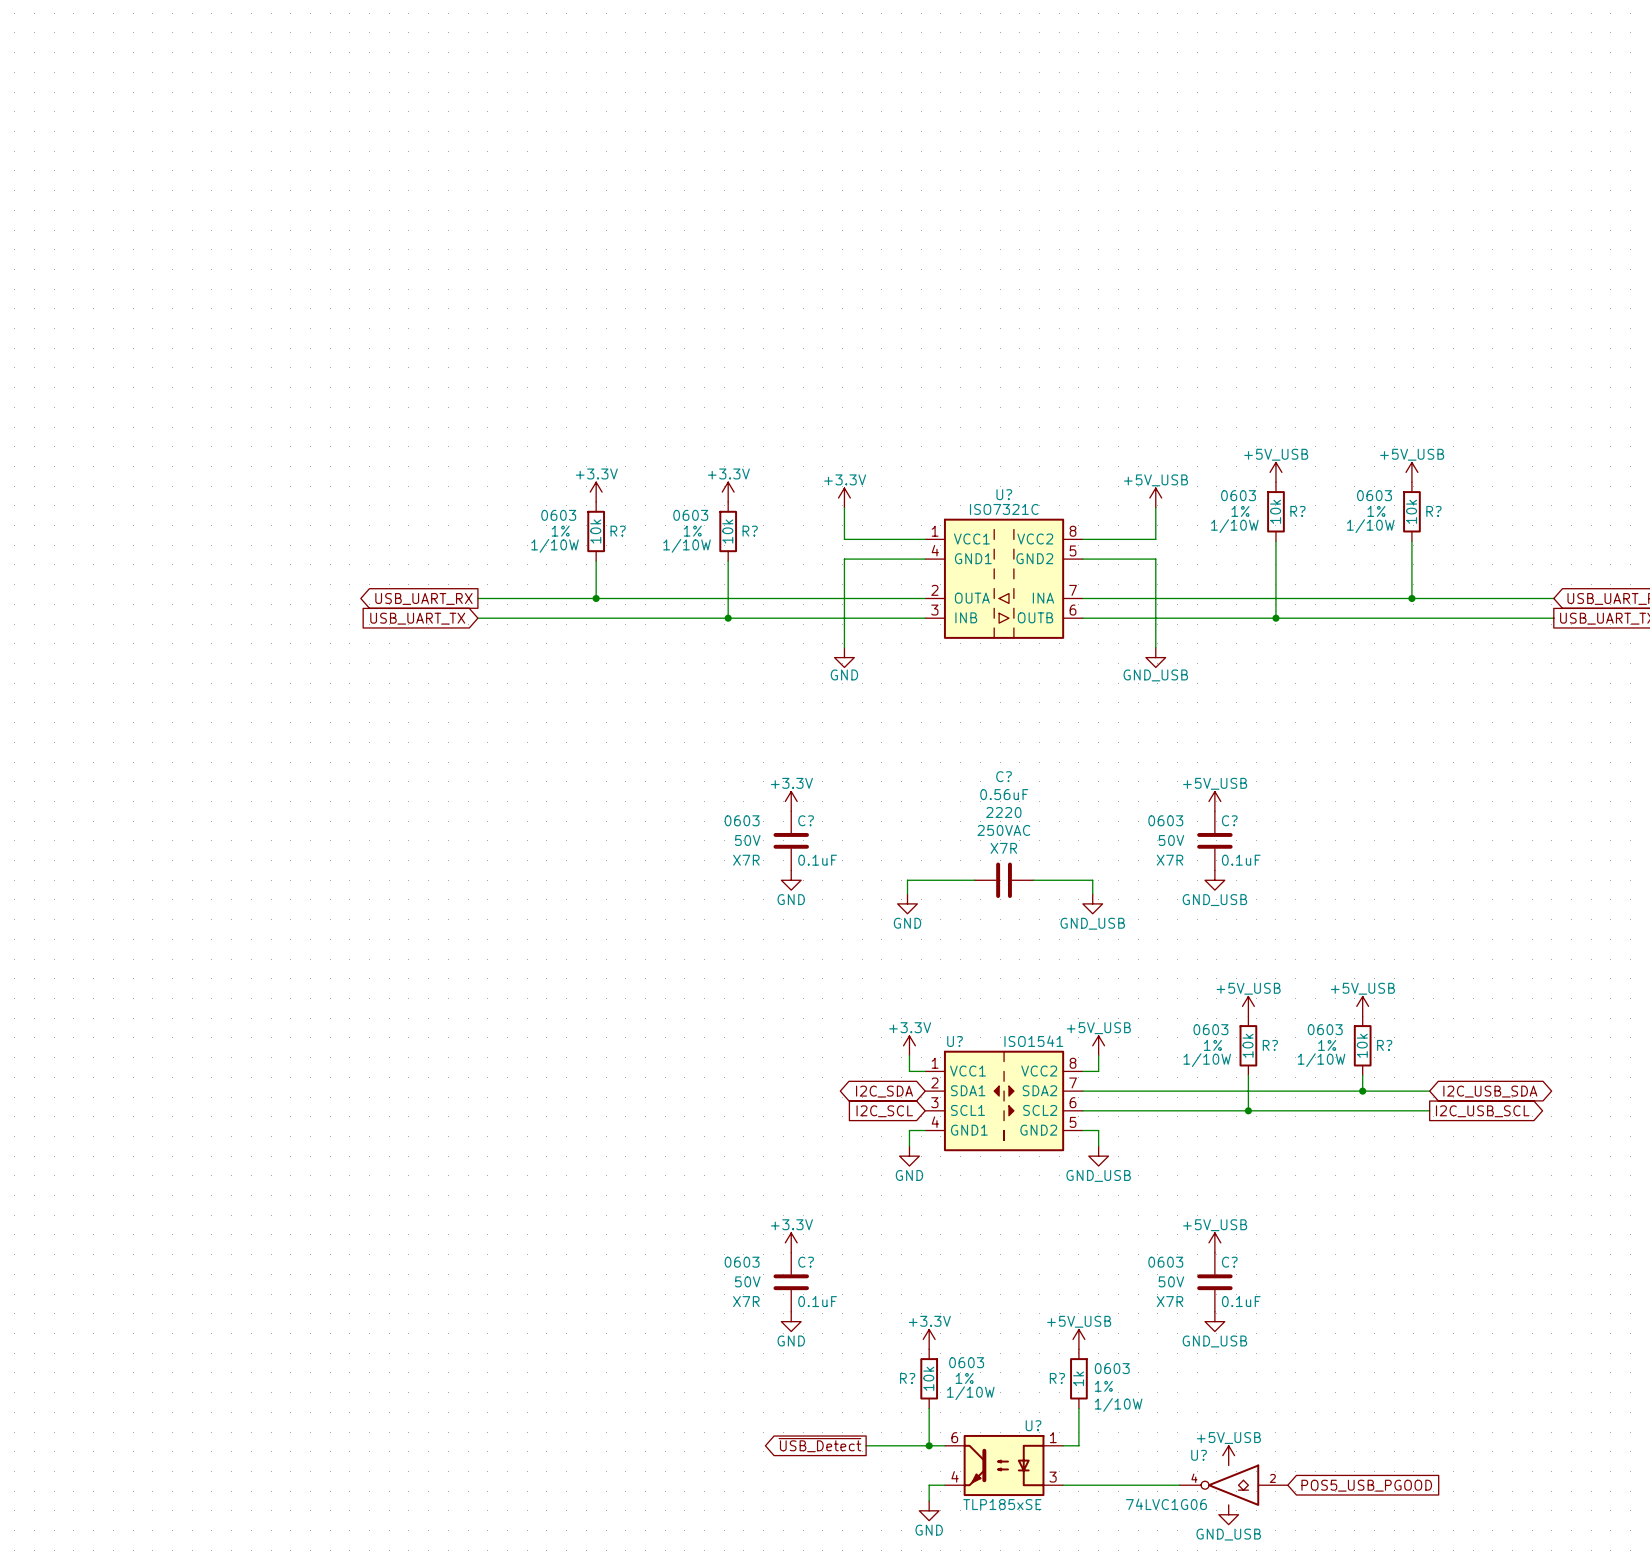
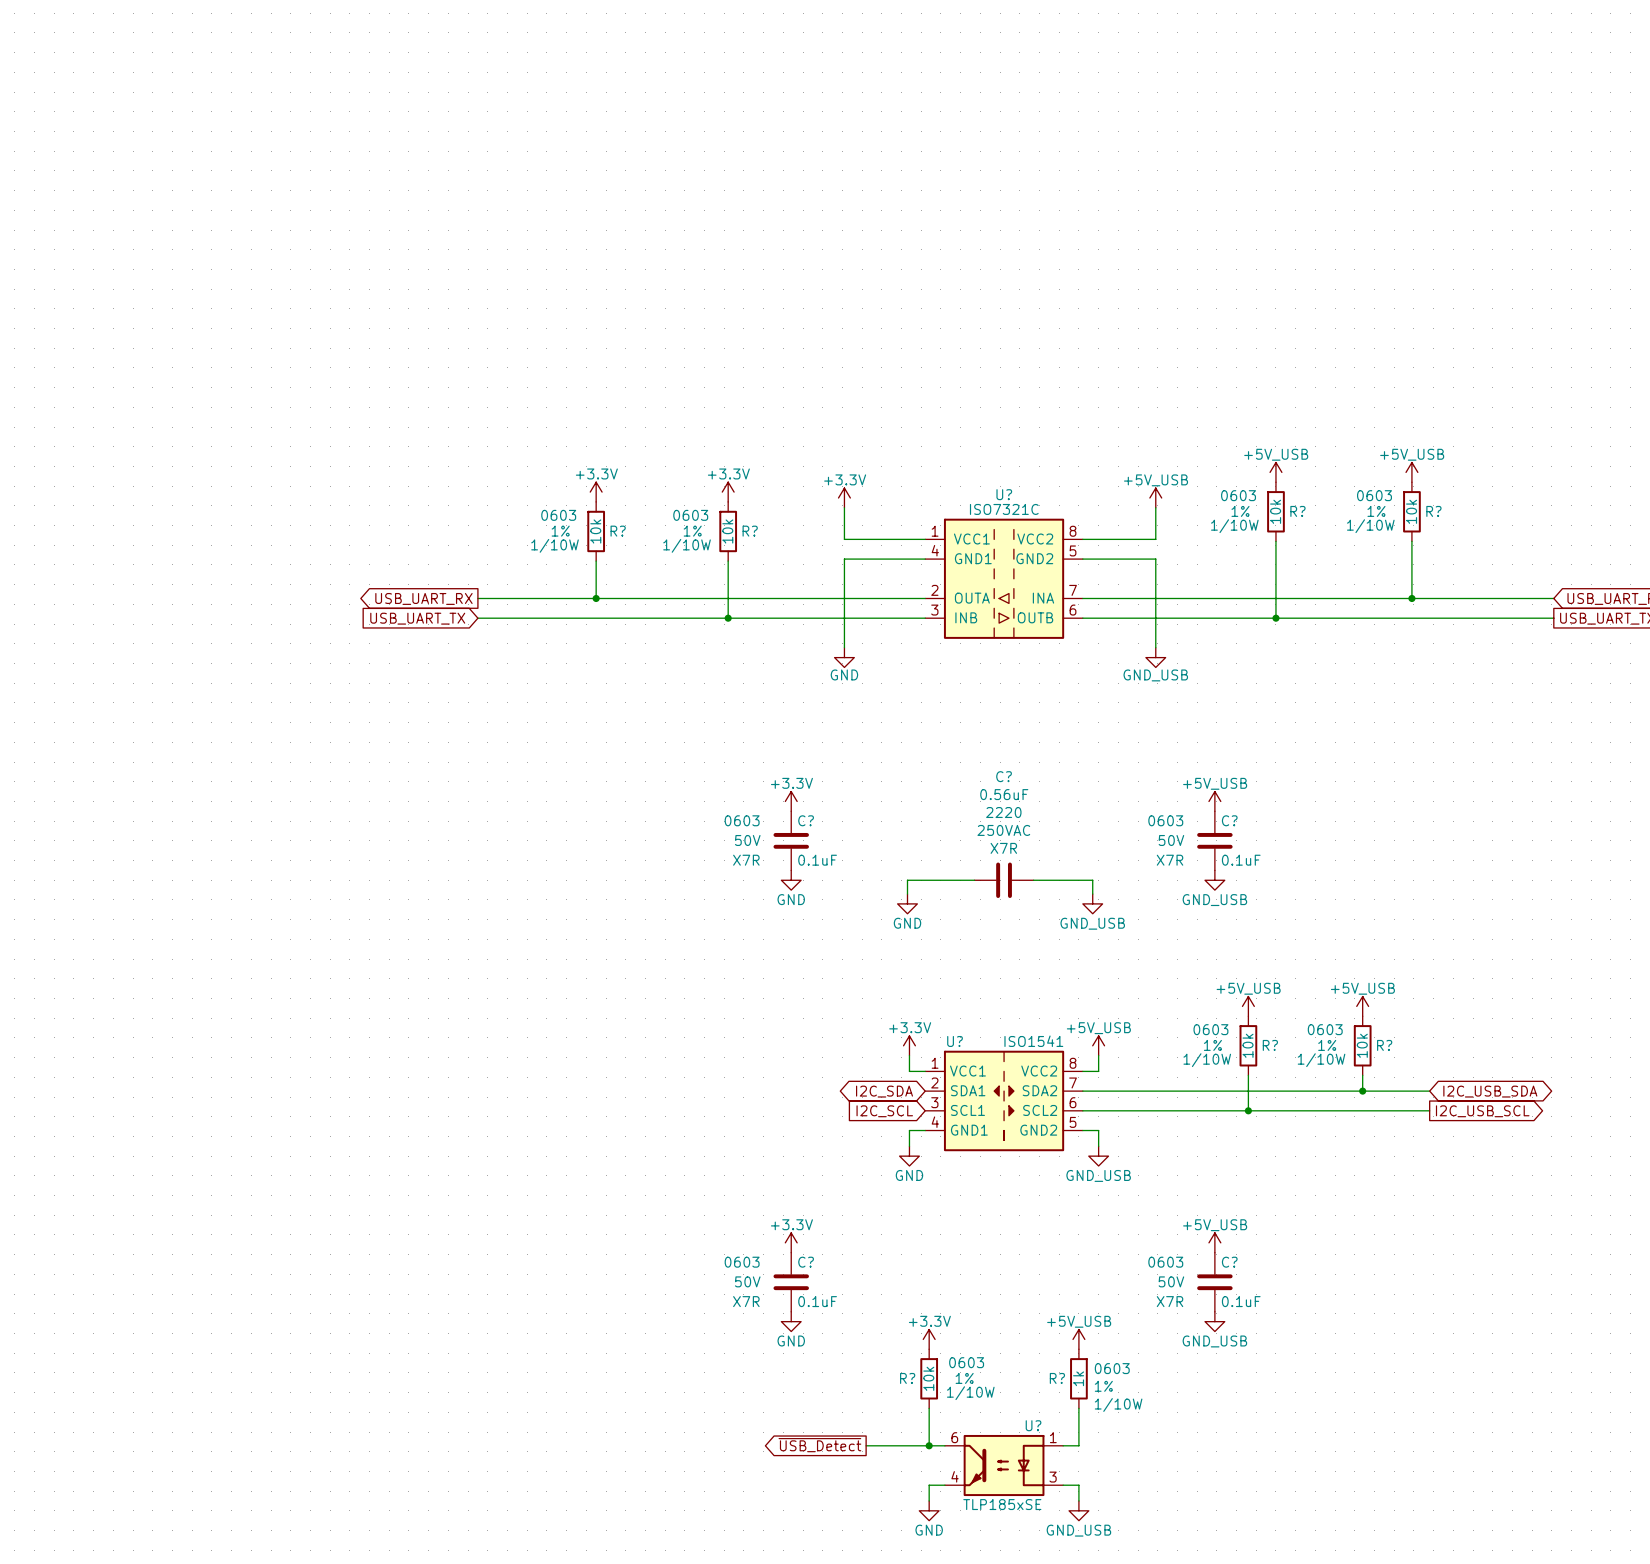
power symbol: +5V_USB (1228, 1455) -> none
wire: (1078, 1485) (1179, 1485) -> (1078, 1485) (1078, 1500)
U?: 74LVC1G06 (1233, 1485) -> none
global label: POS5_USB_PGOOD (1366, 1485) -> none
power symbol position: GND_USB (1228, 1514) -> GND_USB (1078, 1510)

